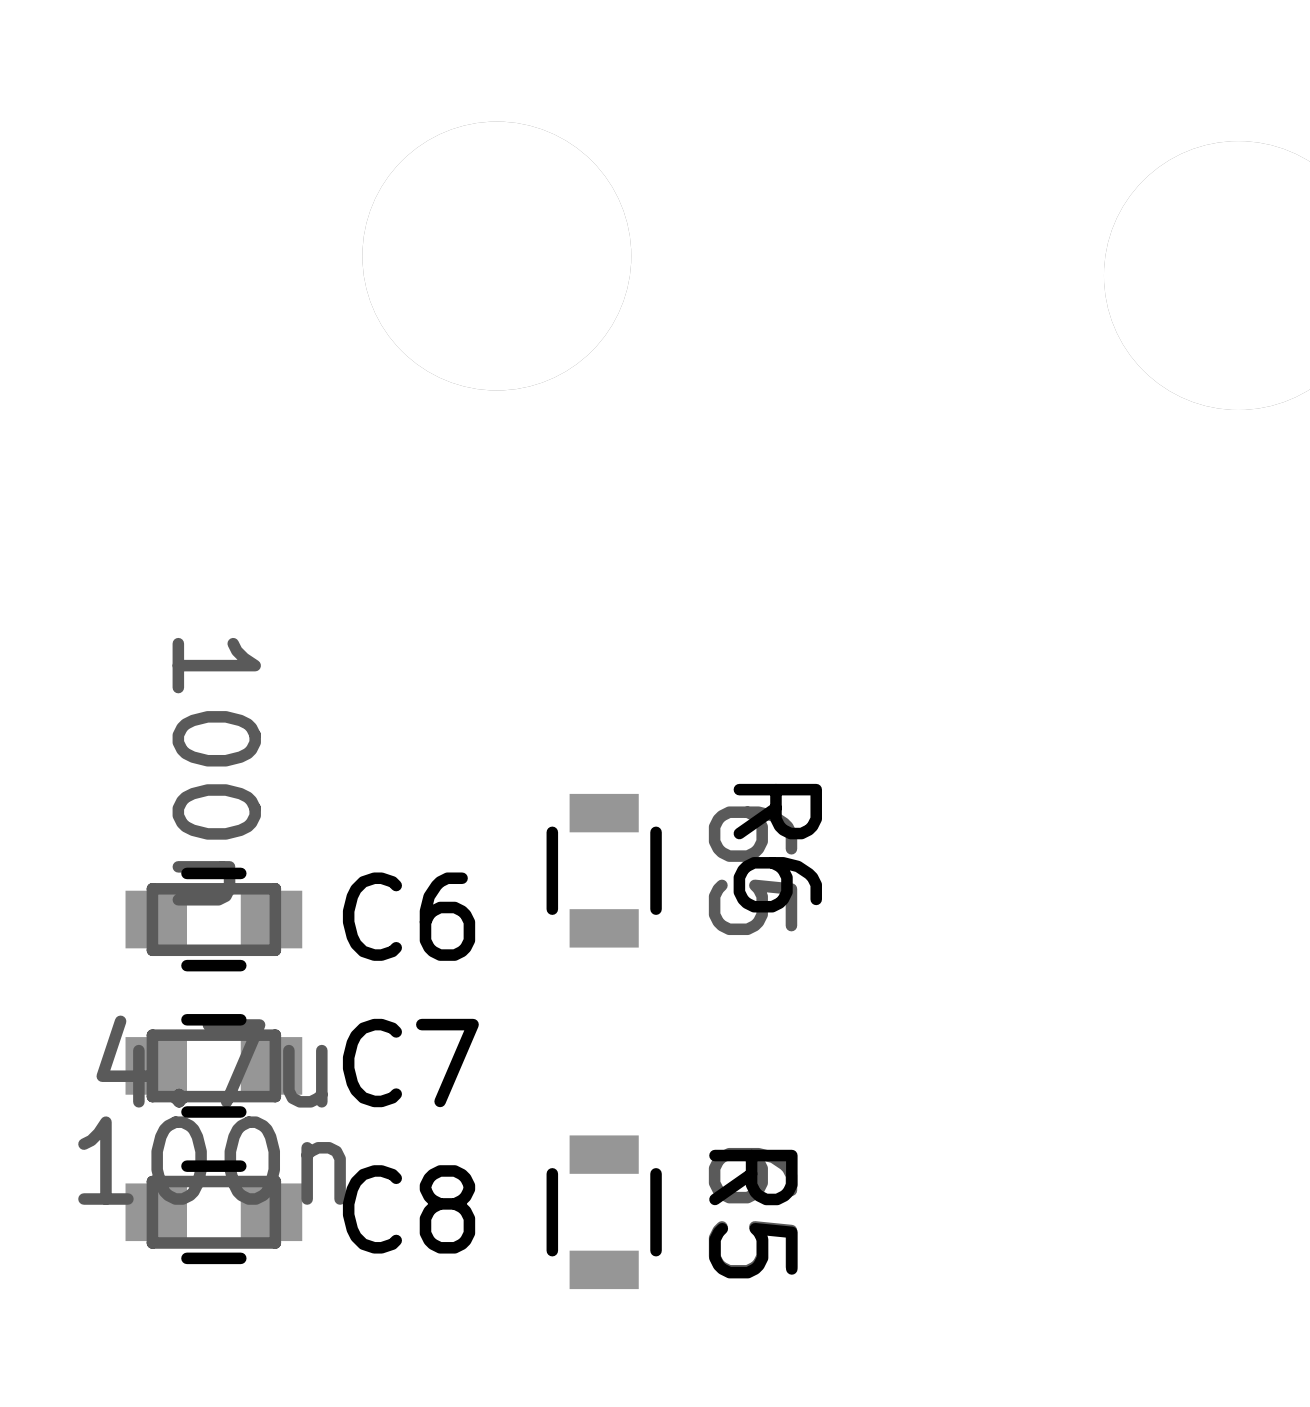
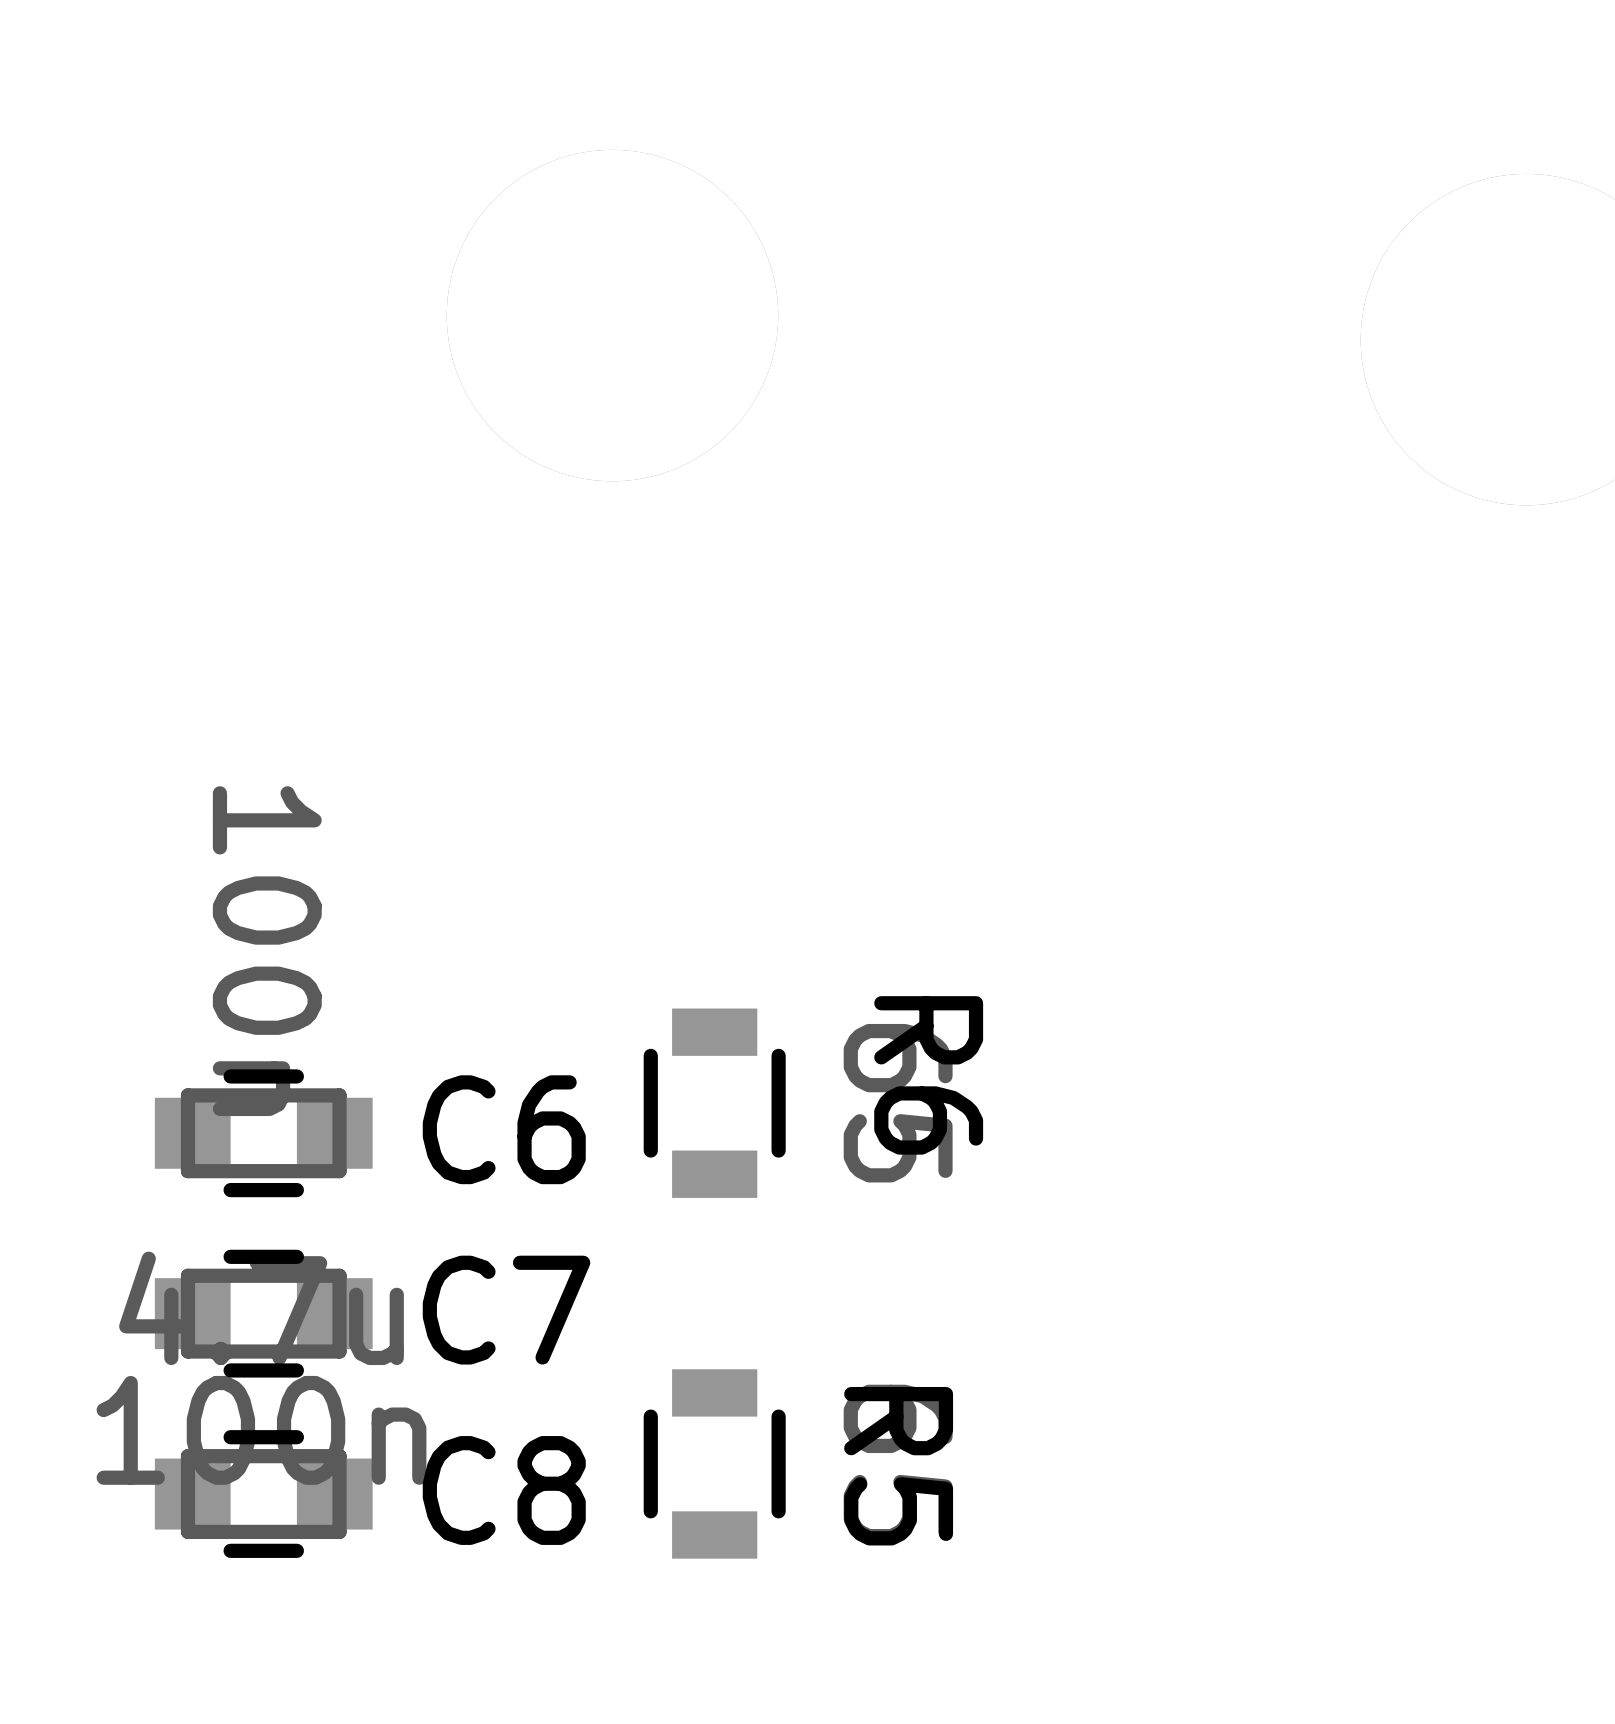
R6 position: (604, 870) -> (714, 1103)
R5 position: (604, 1212) -> (714, 1463)

